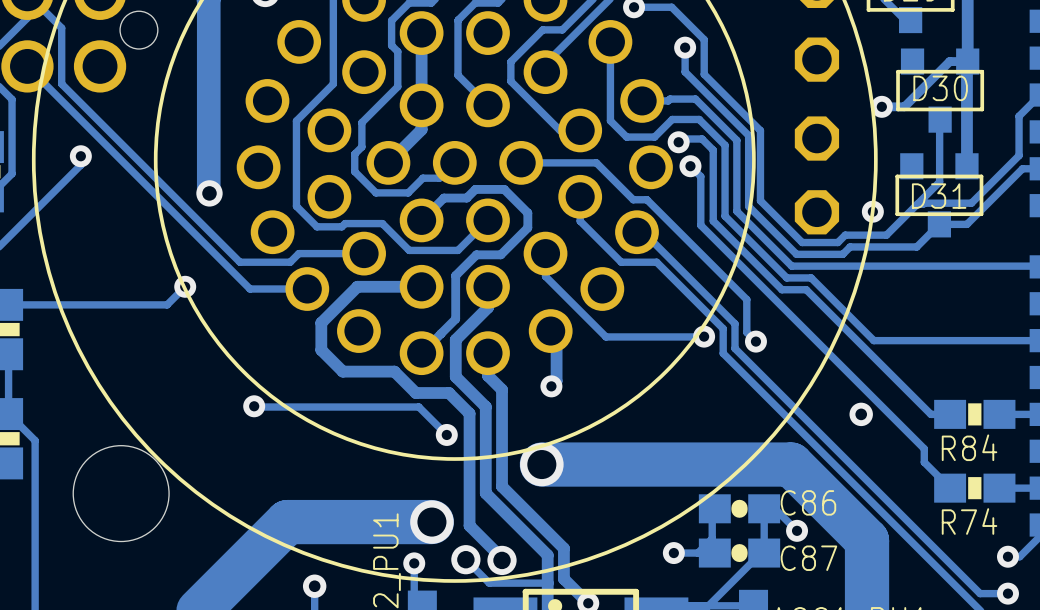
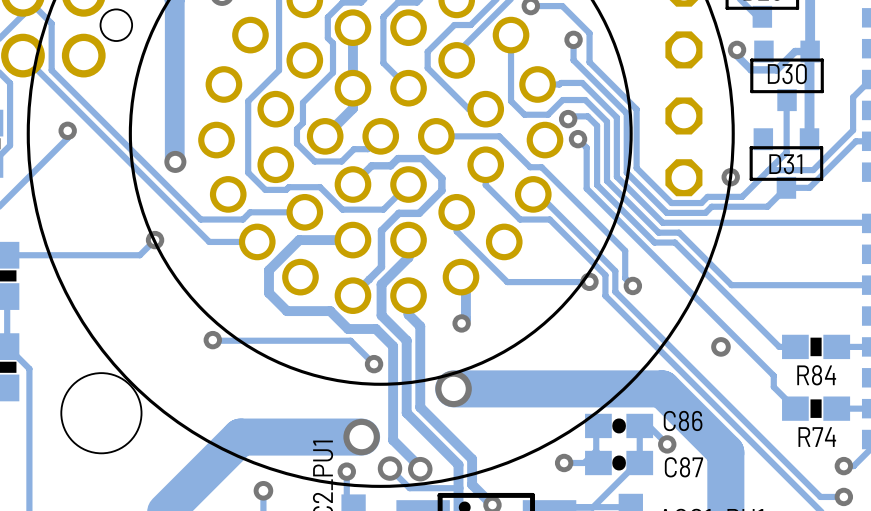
track: (927, 83) (904, 106) (881, 106) -> (776, 69) (751, 69) (737, 55) (737, 49)
via position: (881, 106) -> (737, 49)

